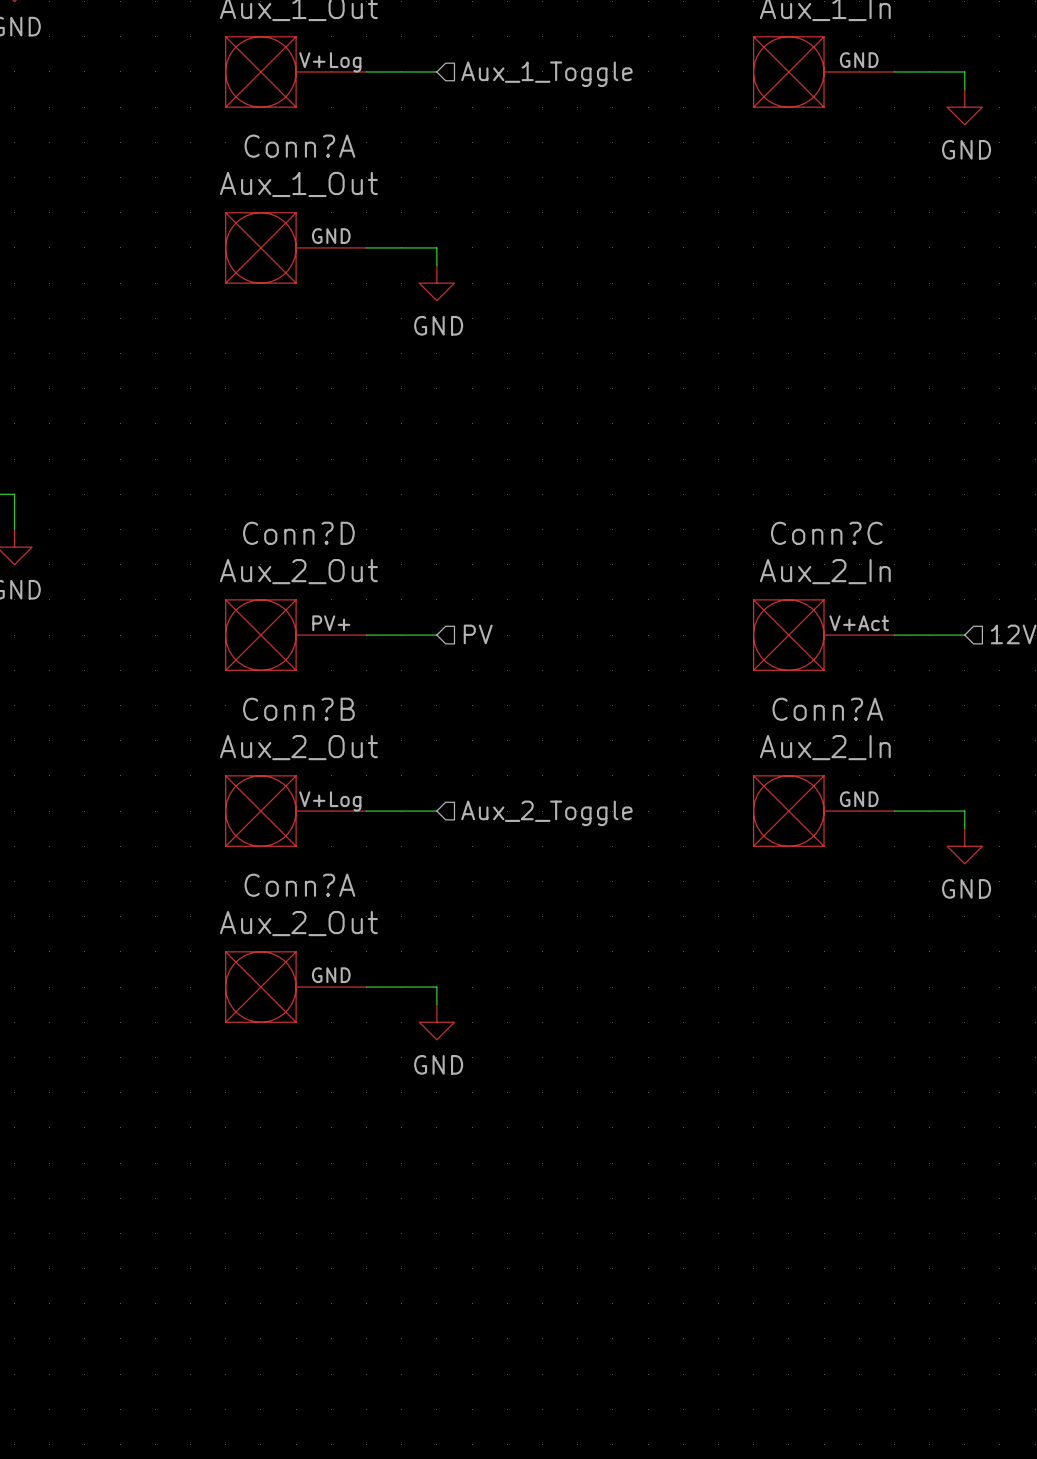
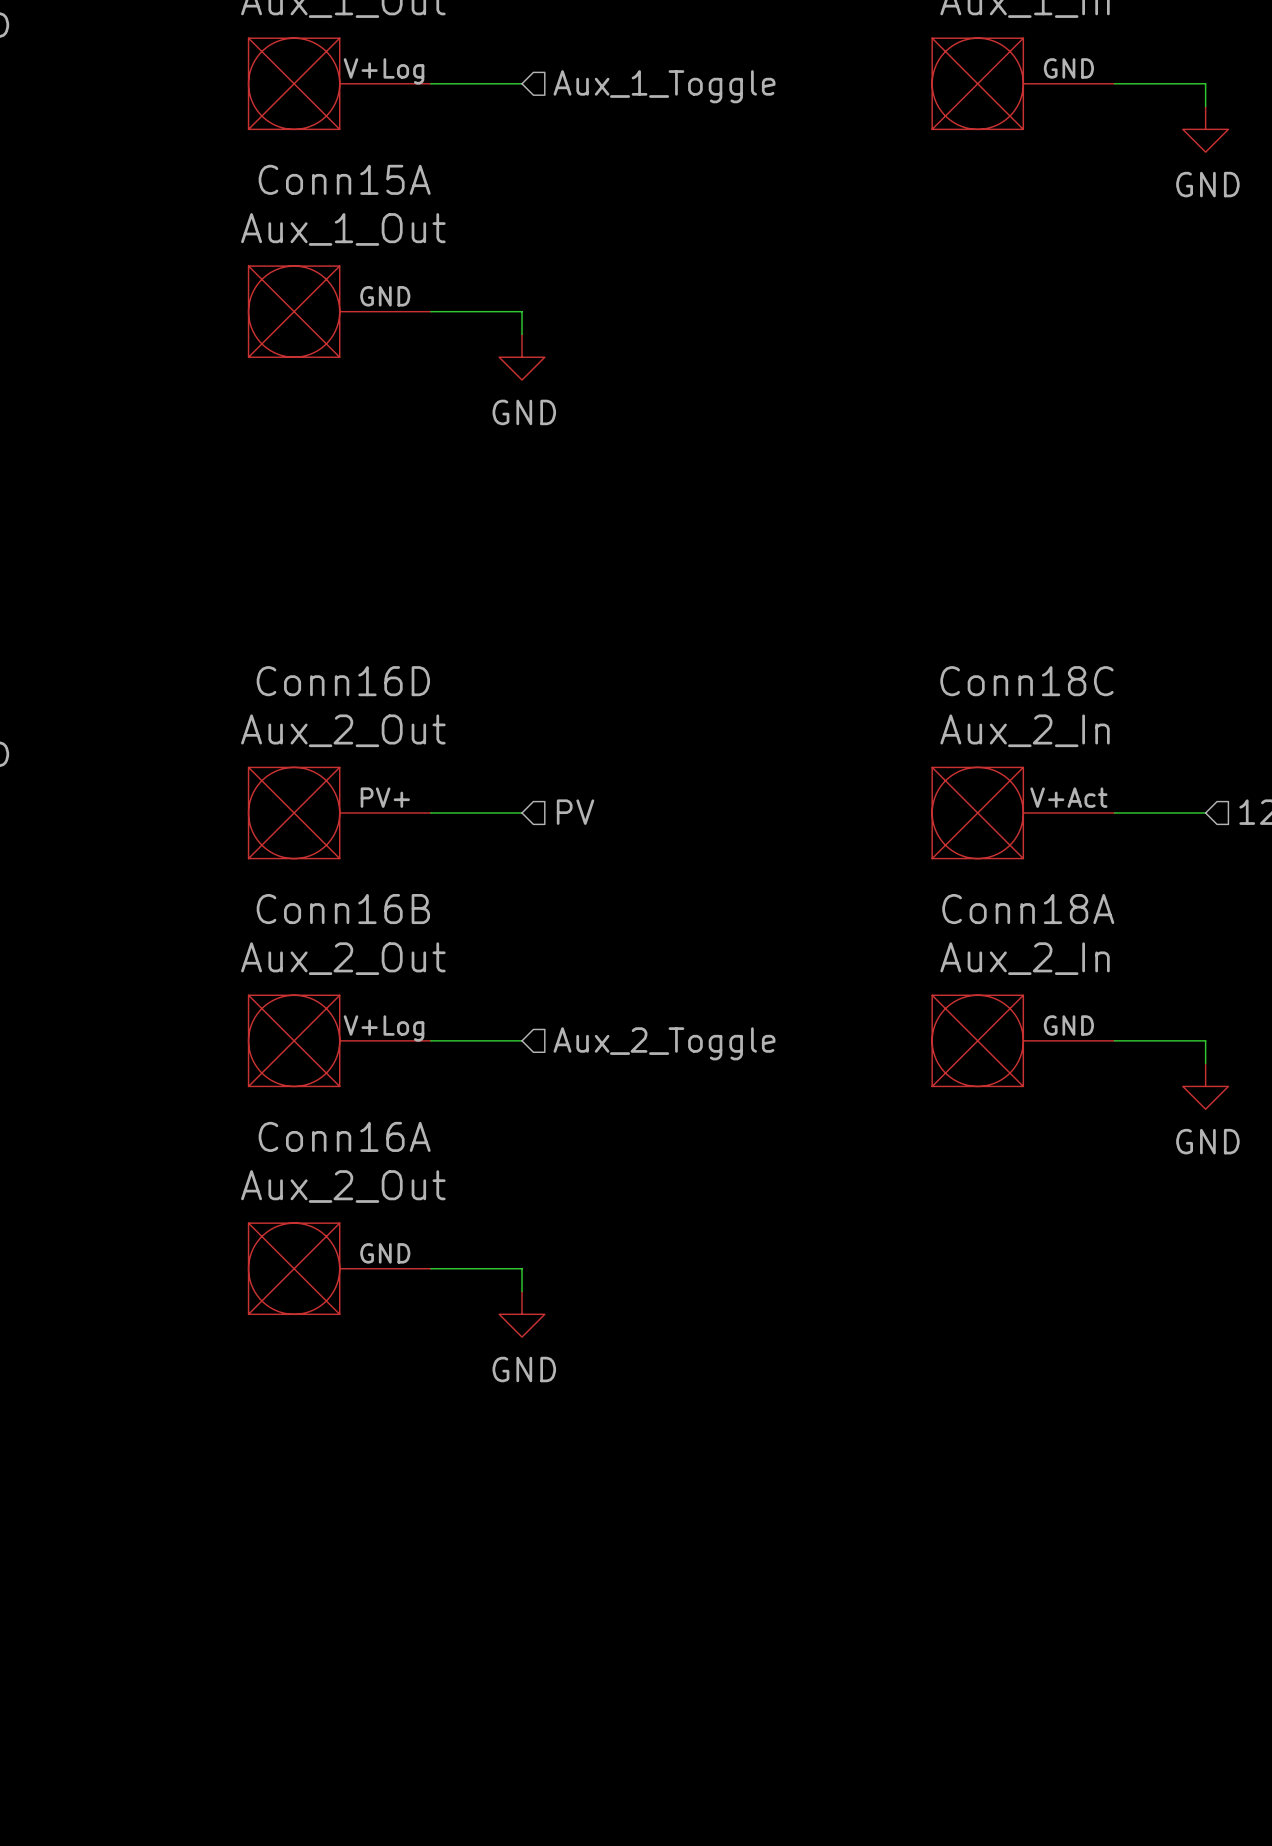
Conn?A name: Conn?A (299, 146) -> Conn15A (344, 179)
Conn?D name: Conn?D (298, 533) -> Conn16D (343, 681)
Conn?C name: Conn?C (826, 533) -> Conn18C (1026, 681)
Conn?B name: Conn?B (298, 709) -> Conn16B (343, 909)
Conn?A name: Conn?A (827, 709) -> Conn18A (1028, 909)
Conn?A name: Conn?A (299, 885) -> Conn16A (344, 1136)

